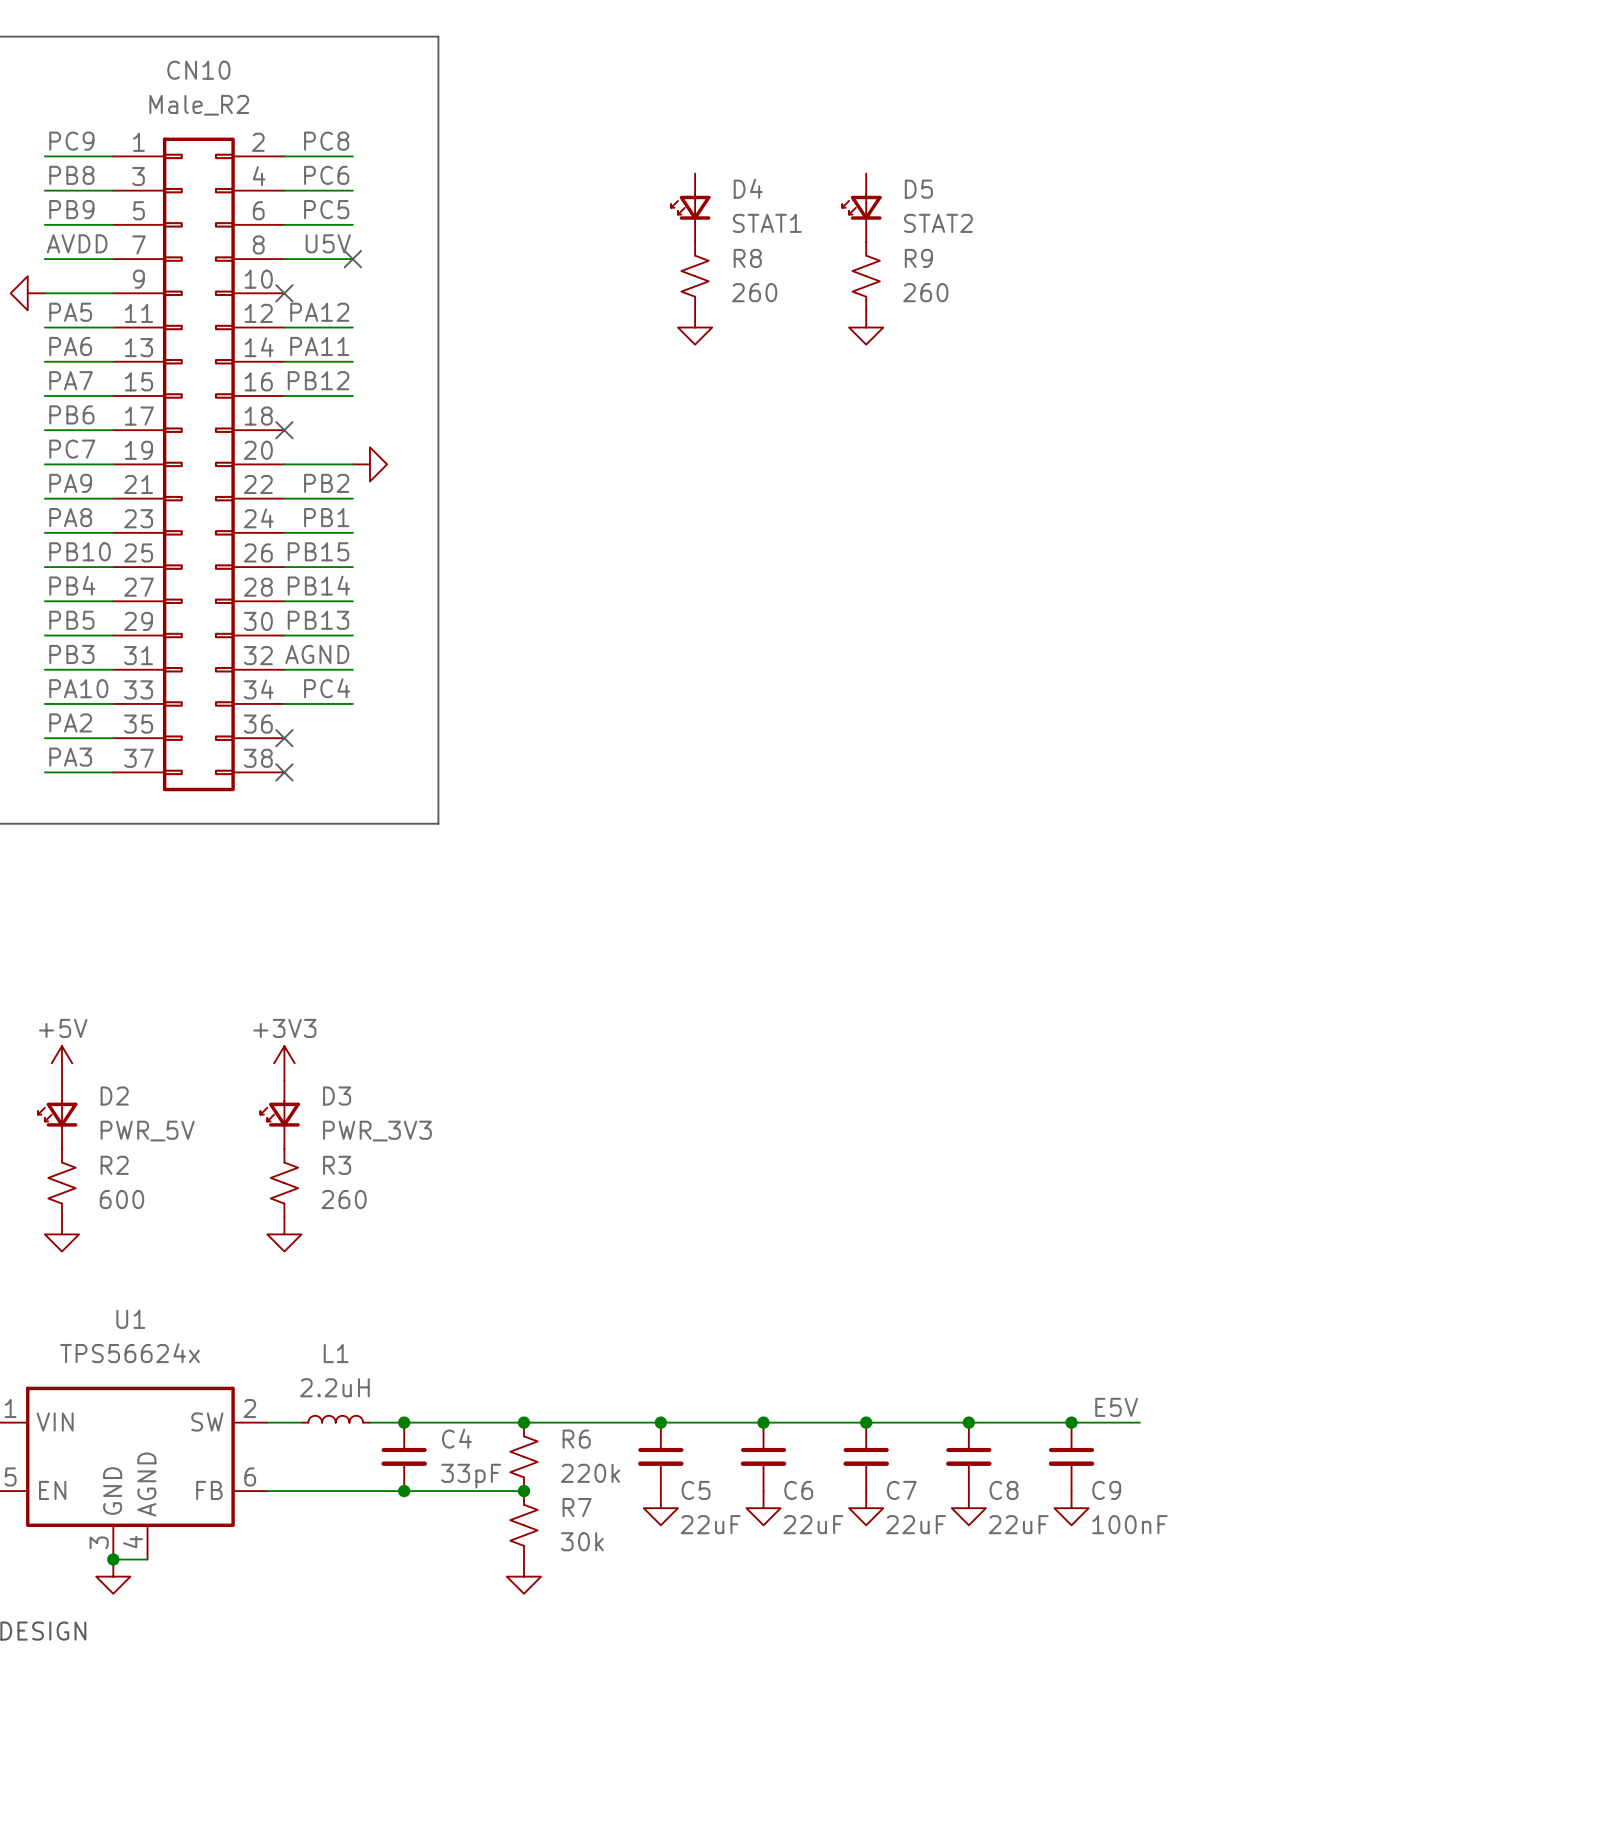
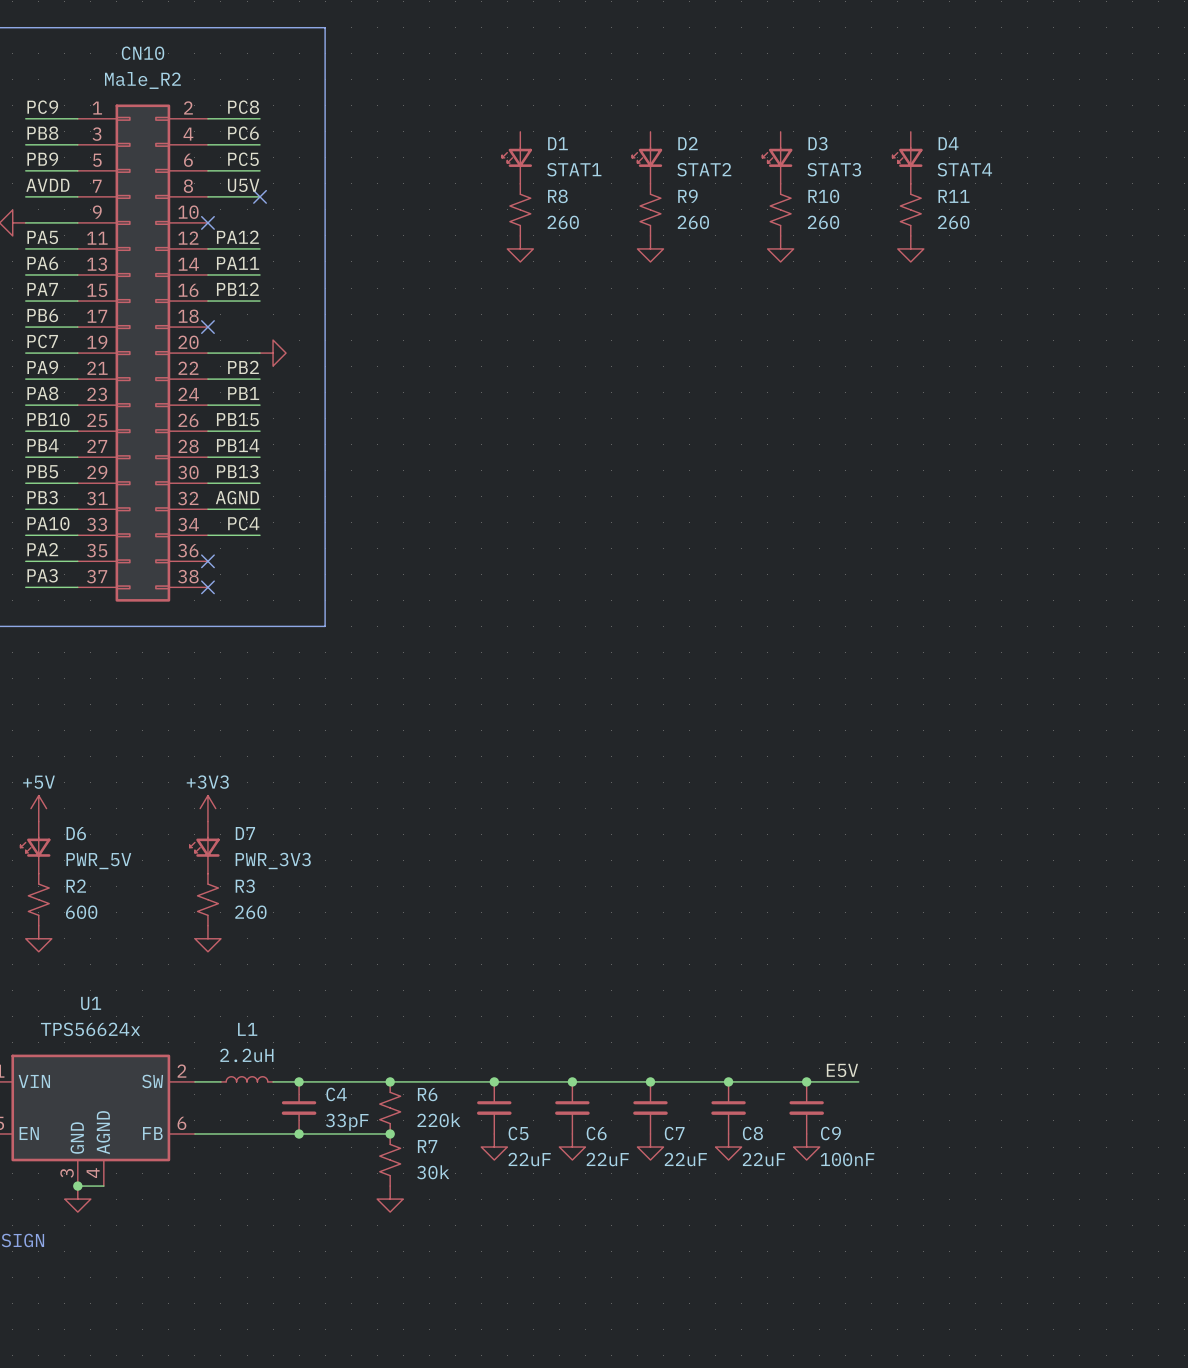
D4 name: D4 (748, 188) -> D1 (557, 143)
D5 name: D5 (918, 189) -> D2 (688, 143)
D3: none -> STAT3 (777, 157)
D4: none -> STAT4 (907, 157)
R10: none -> 260 (780, 209)
R11: none -> 260 (910, 209)
power symbol: none -> (780, 248)
power symbol: none -> (910, 248)
D2 name: D2 (114, 1096) -> D6 (76, 833)
D3 name: D3 (337, 1096) -> D7 (245, 833)

